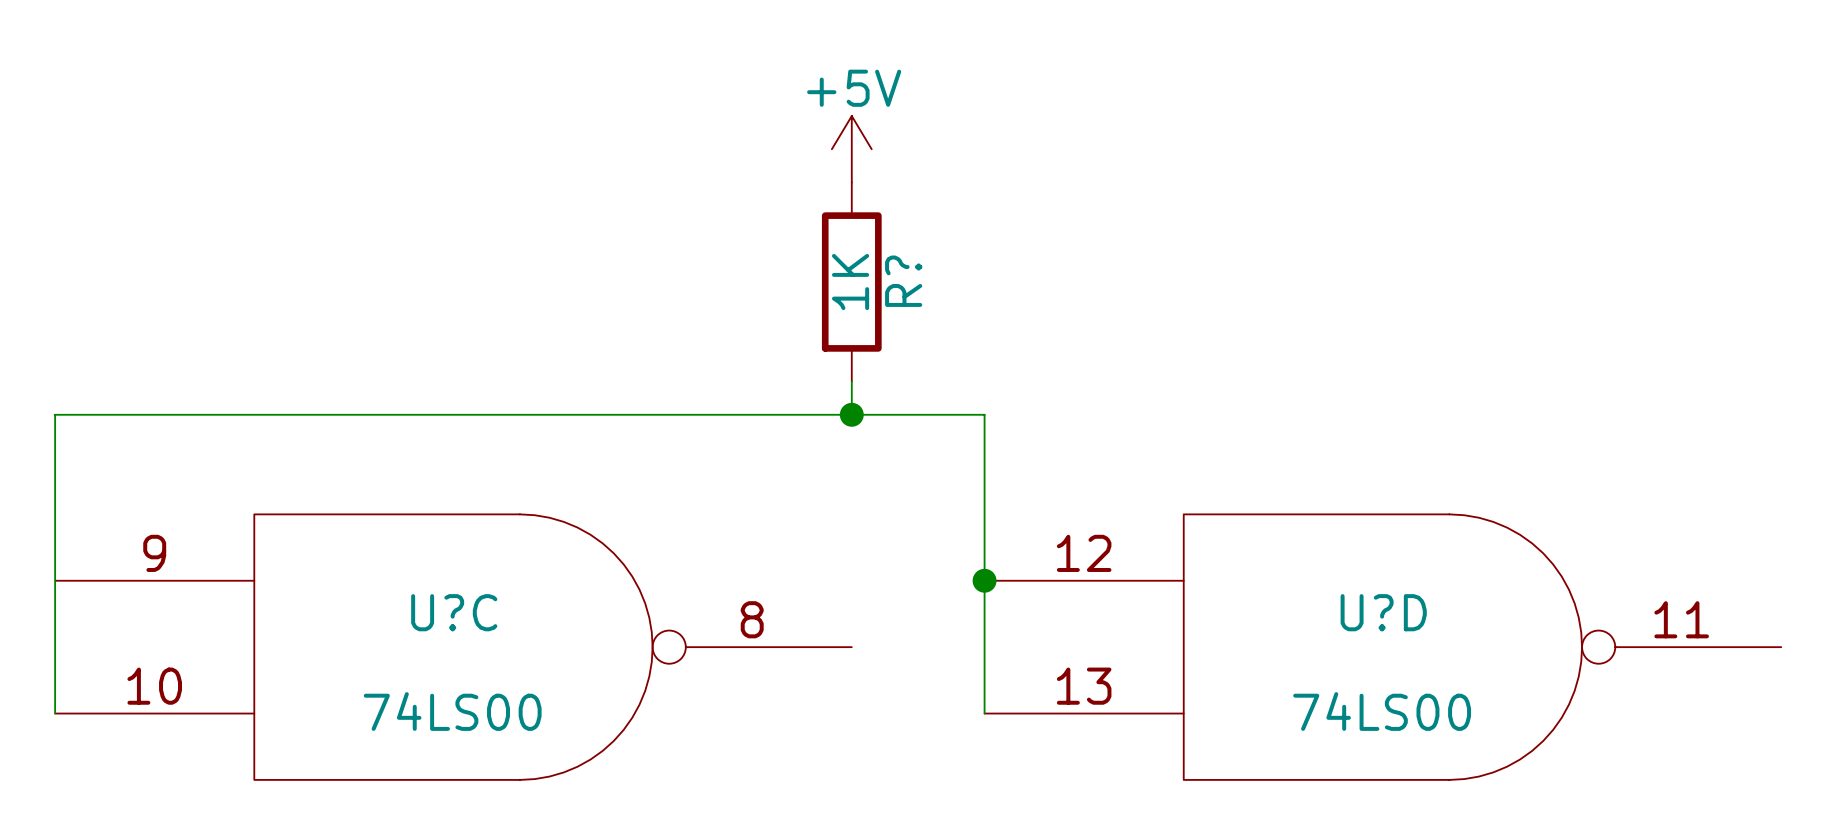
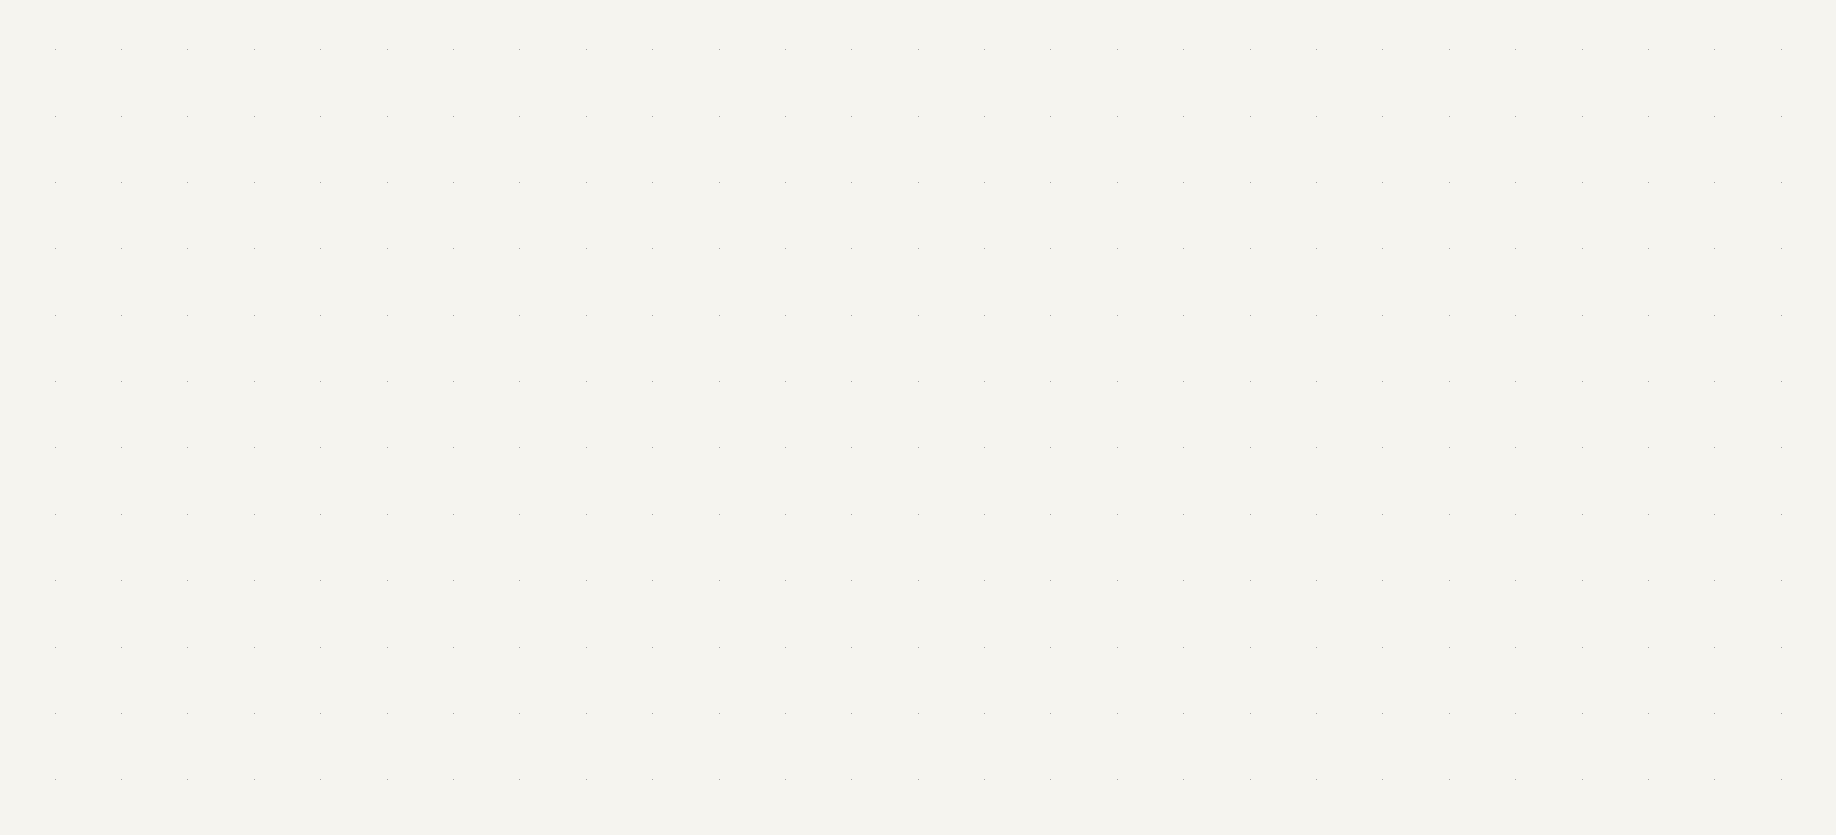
power symbol: +5V (851, 149) -> none
R?: 1K (851, 282) -> none
wire: (851, 381) (851, 414) -> none
junction: (851, 414) -> none
junction: (984, 580) -> none
U?C: 74LS00 (453, 647) -> none
U?D: 74LS00 (1382, 647) -> none
wire: (55, 713) (55, 414) (984, 414) (984, 713) -> none

